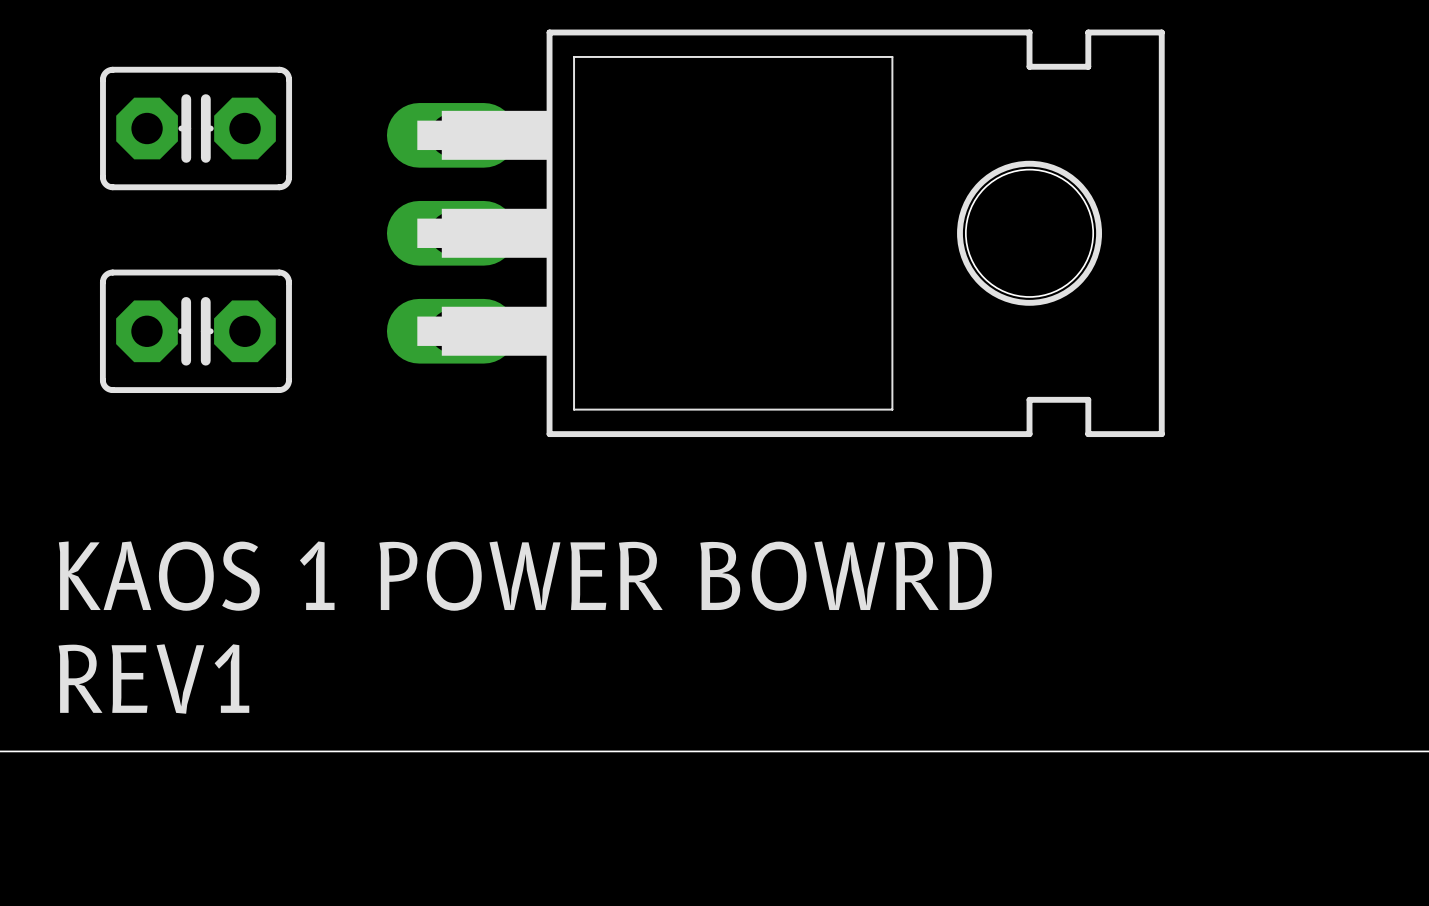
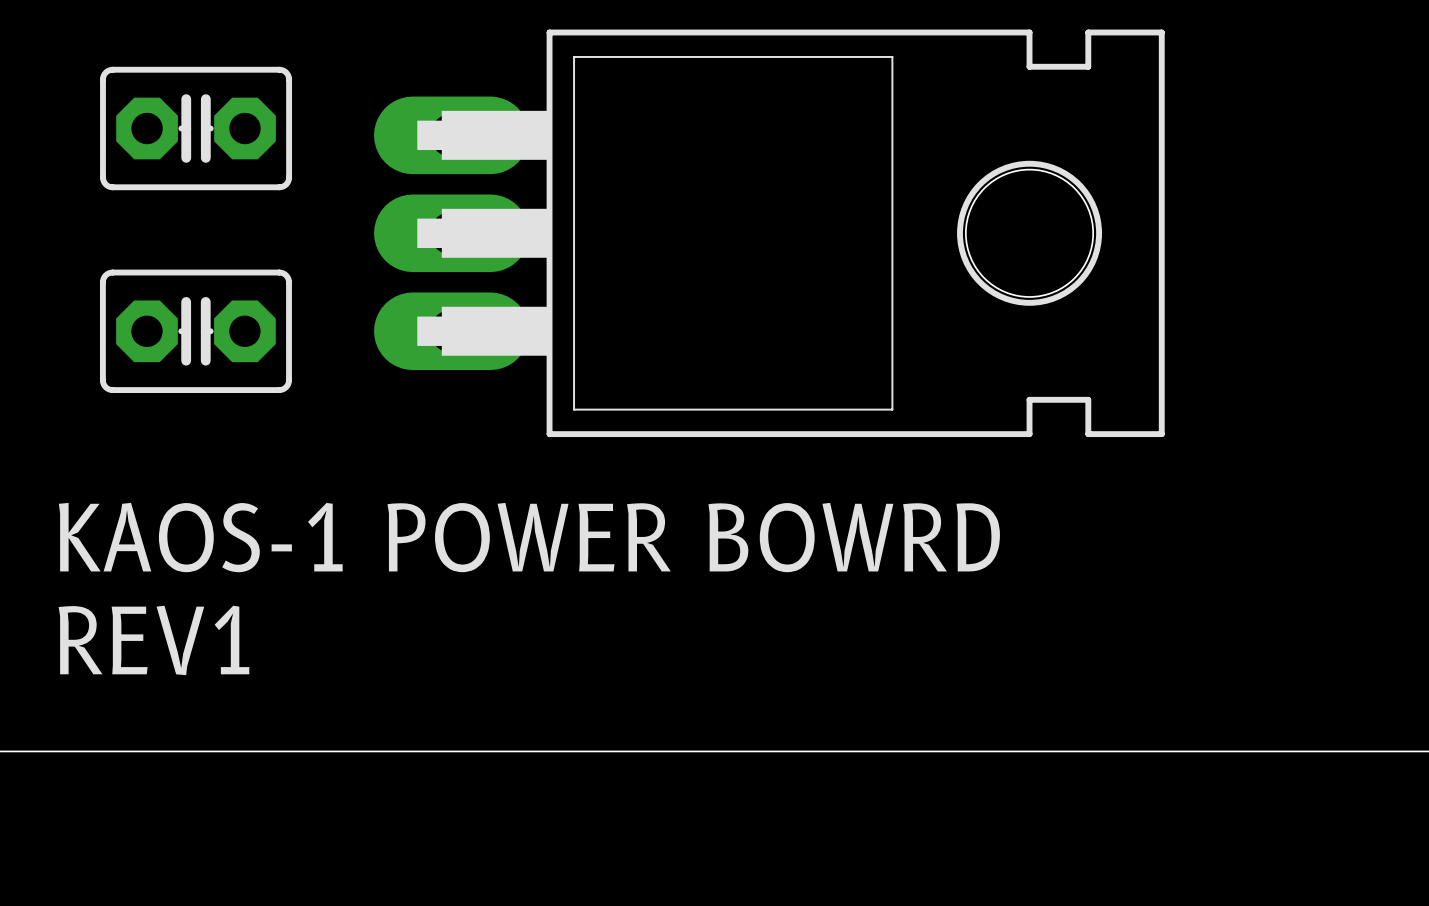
part footprint: [386, 29, 1165, 438] -> [374, 29, 1165, 438]
text: KAOS 1 POWER BOWRD (525, 576) -> KAOS-1 POWER BOWRD (529, 537)
text position: REV1 (153, 679) -> REV1 (153, 640)

